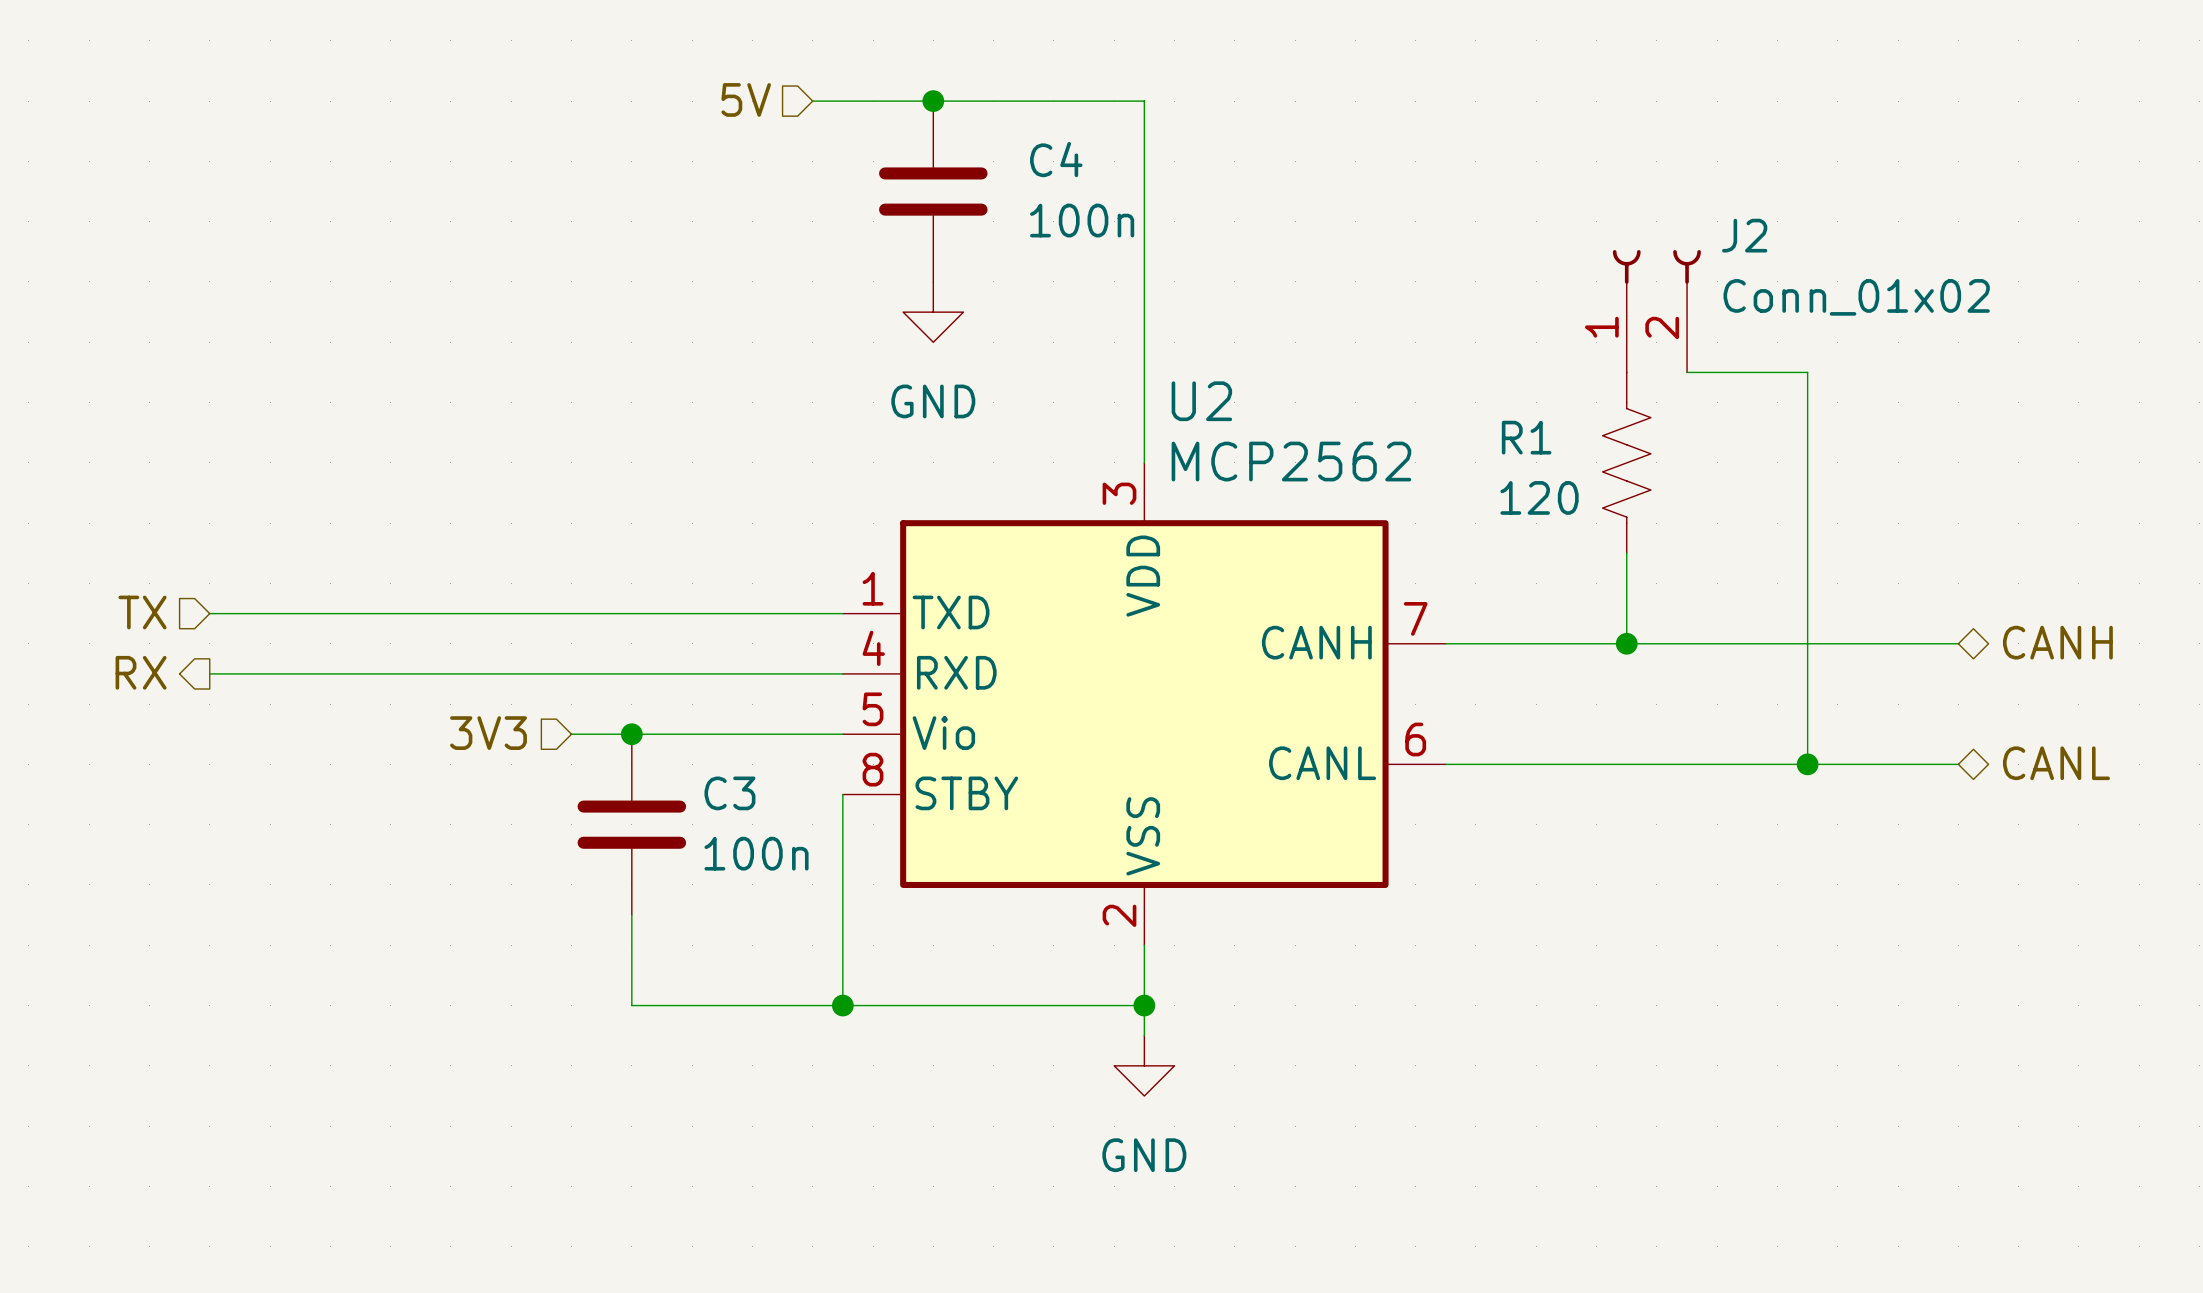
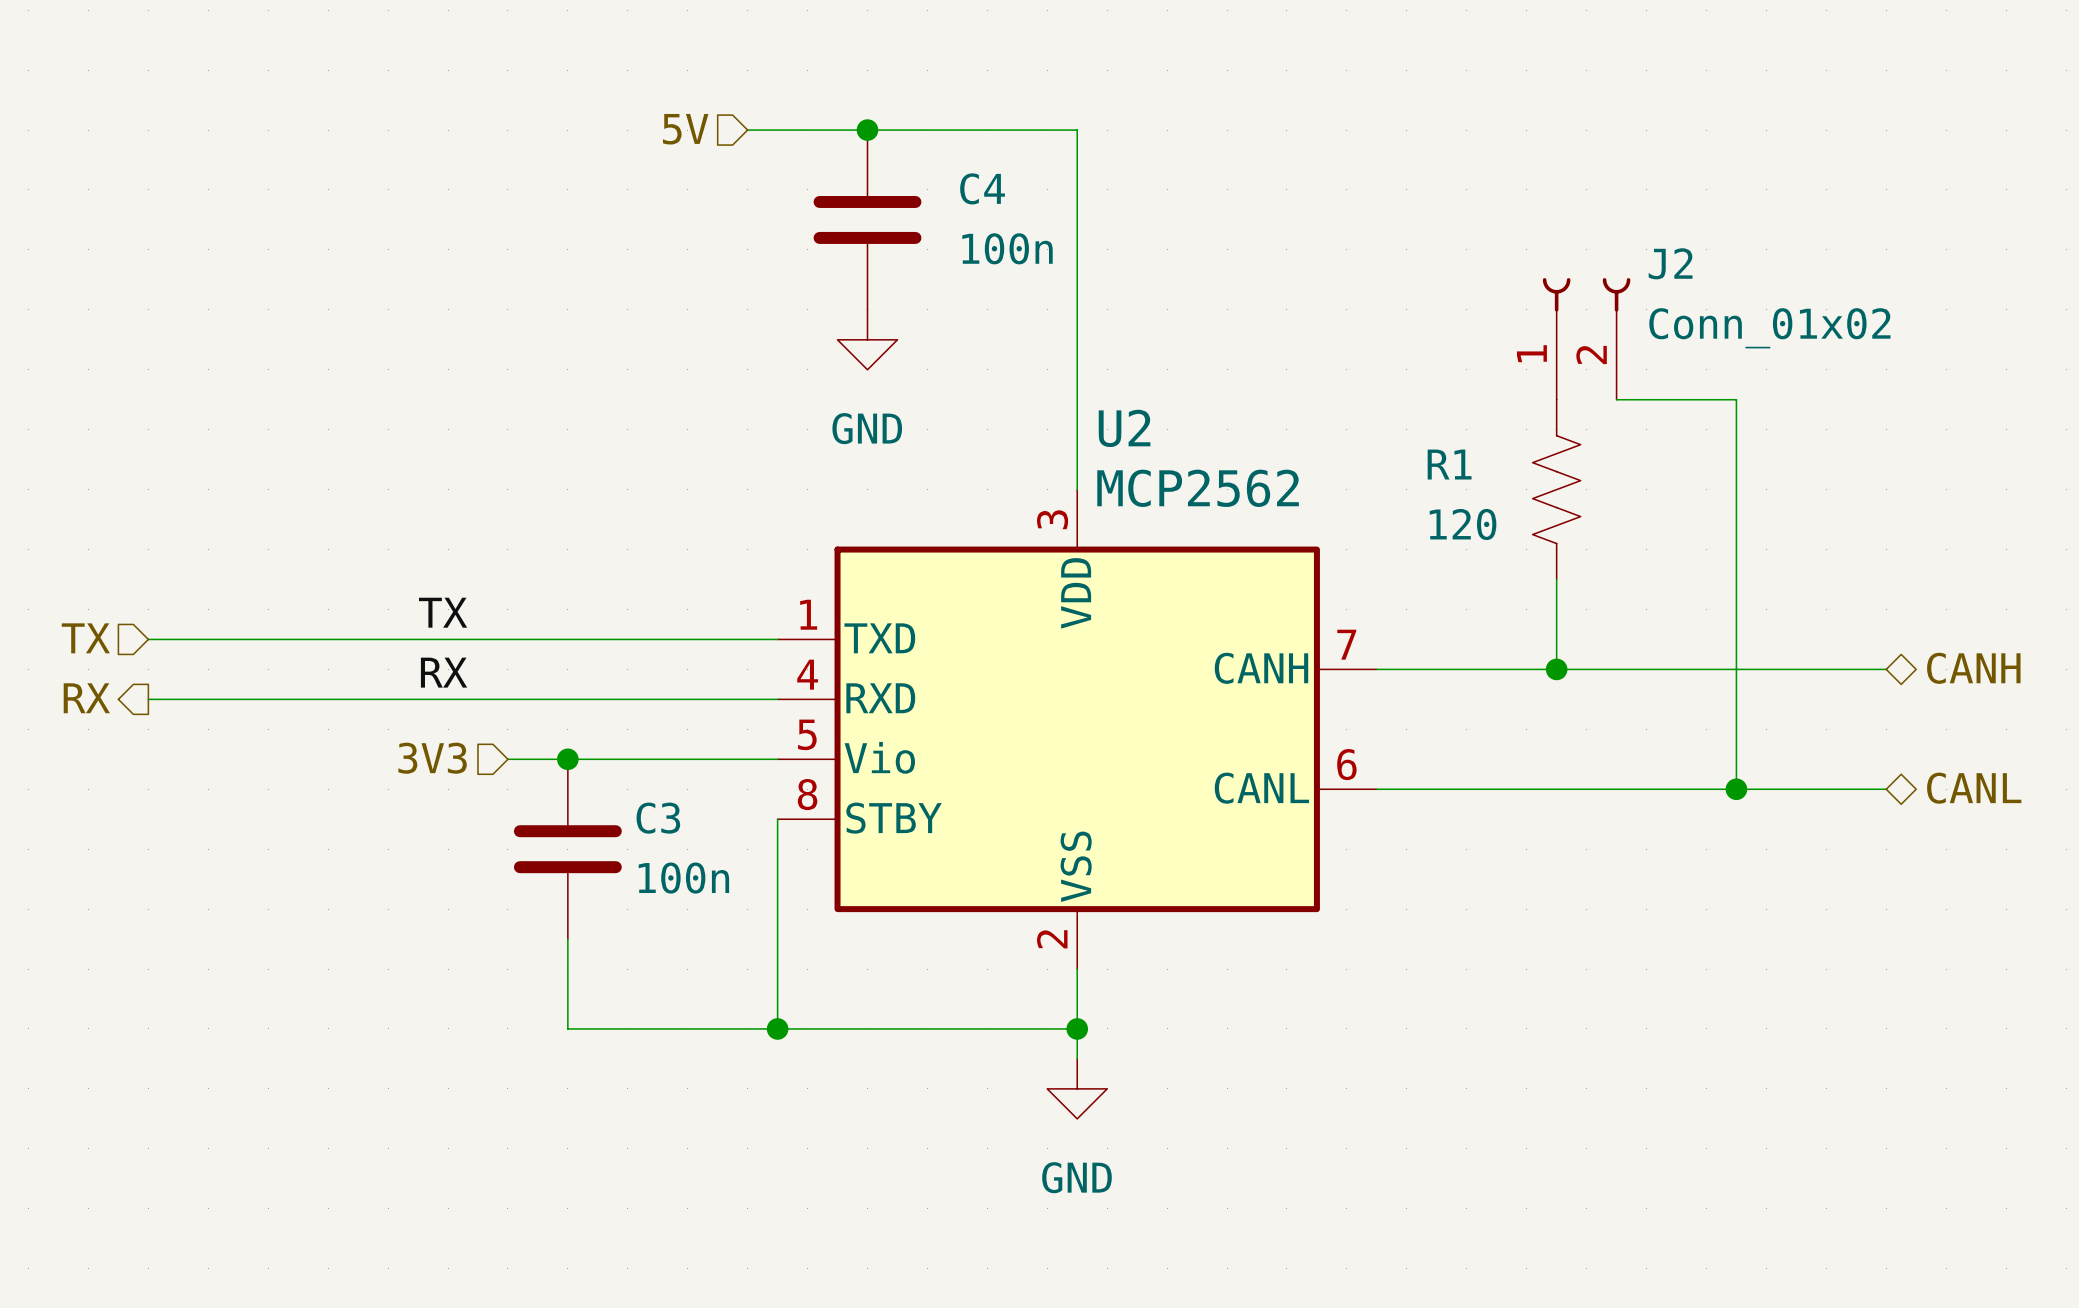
label: none -> TX (443, 612)
label: none -> RX (444, 672)

